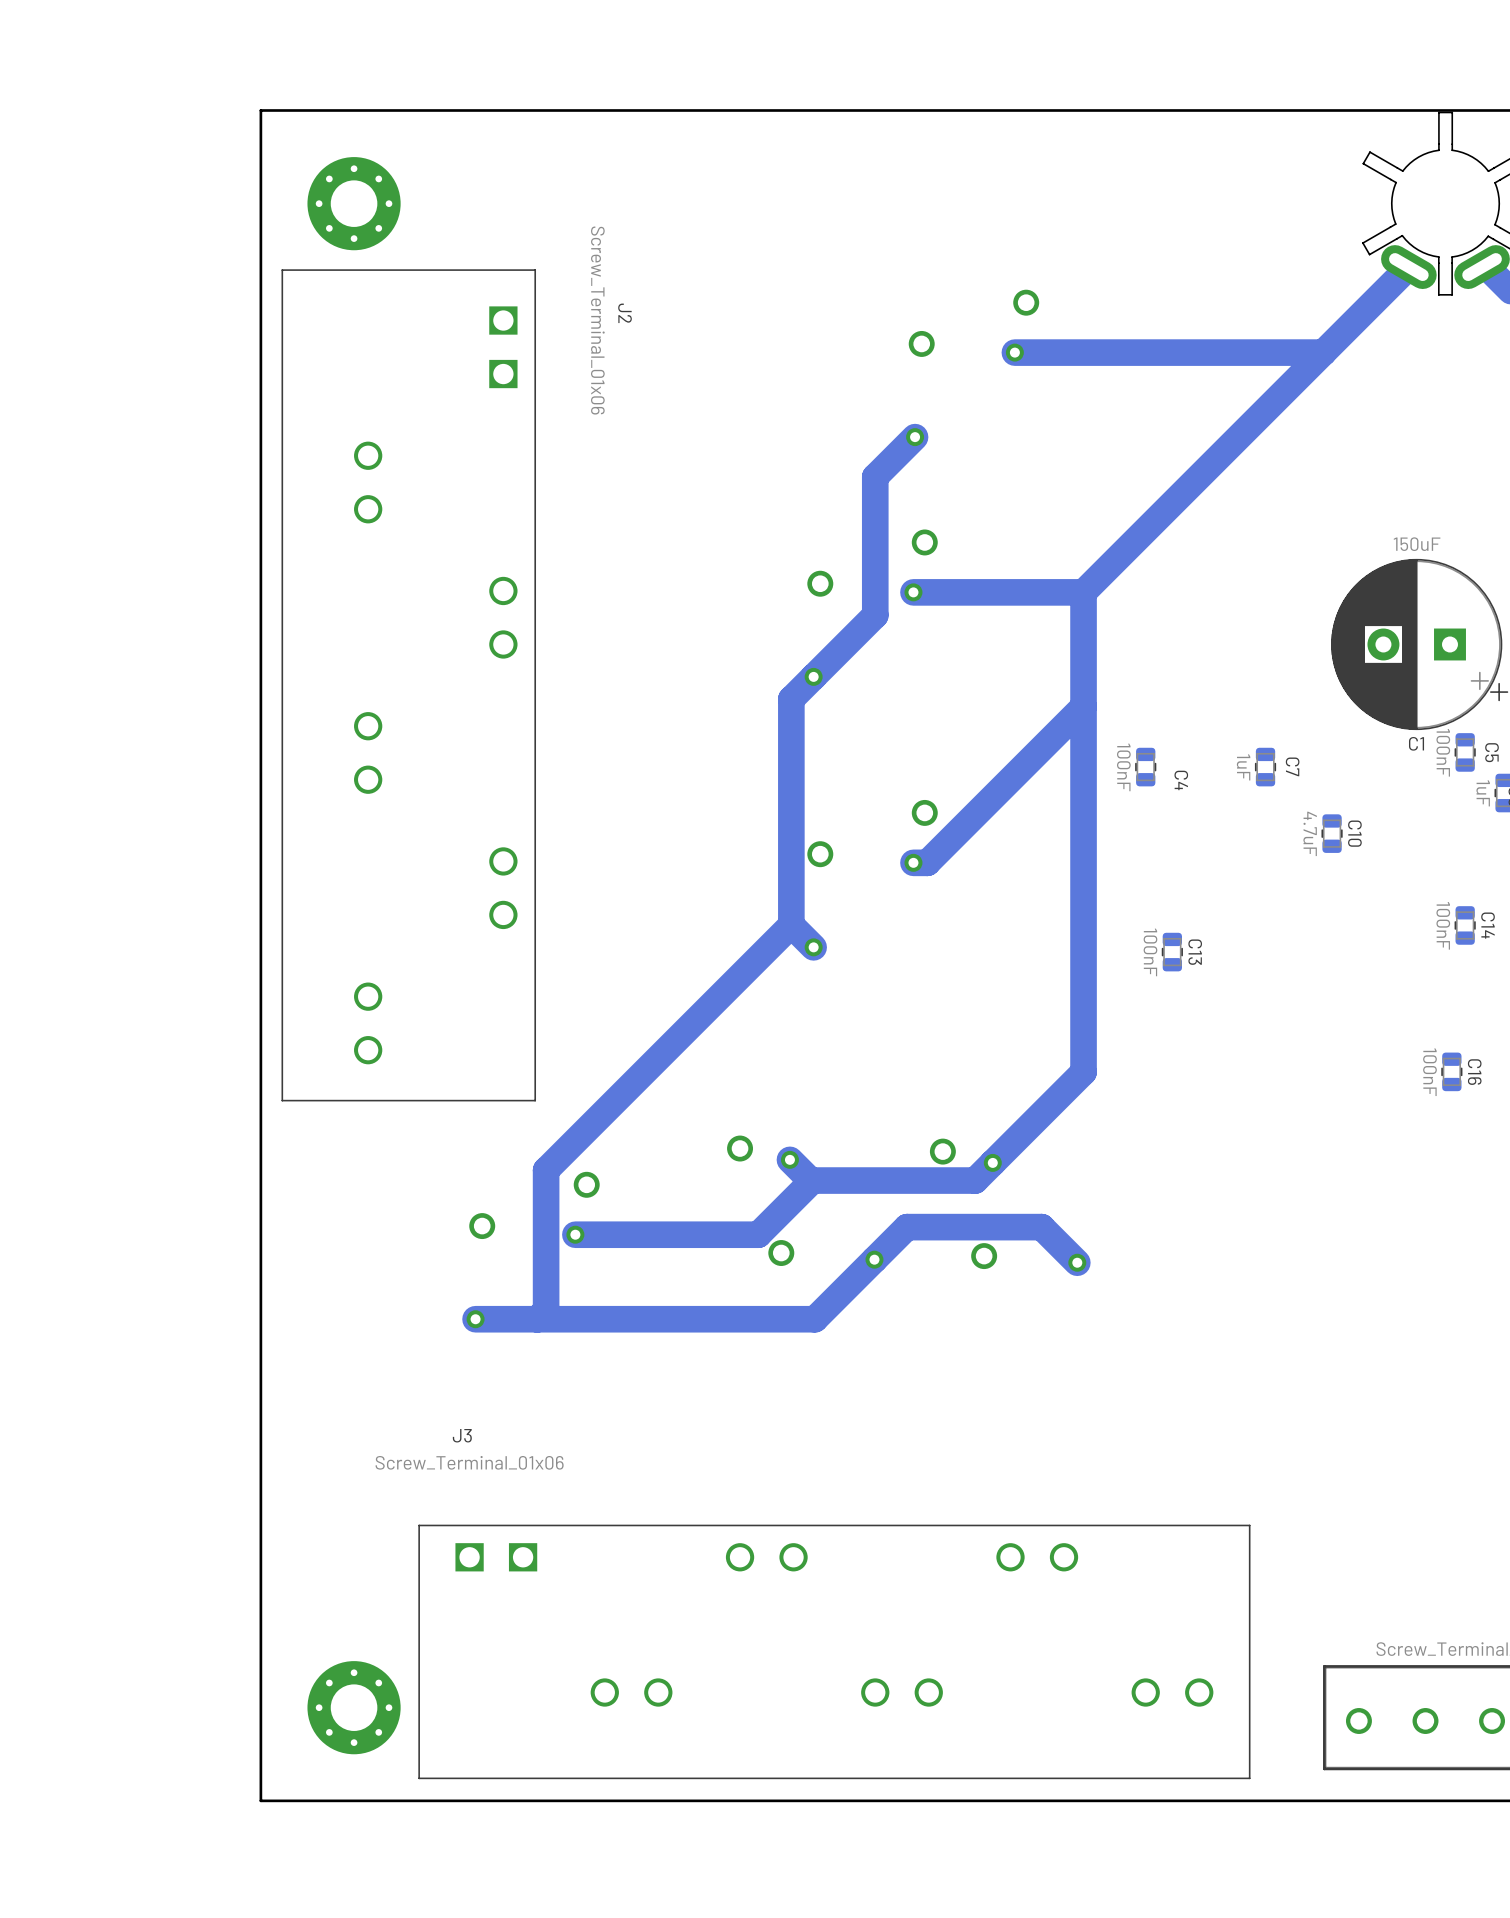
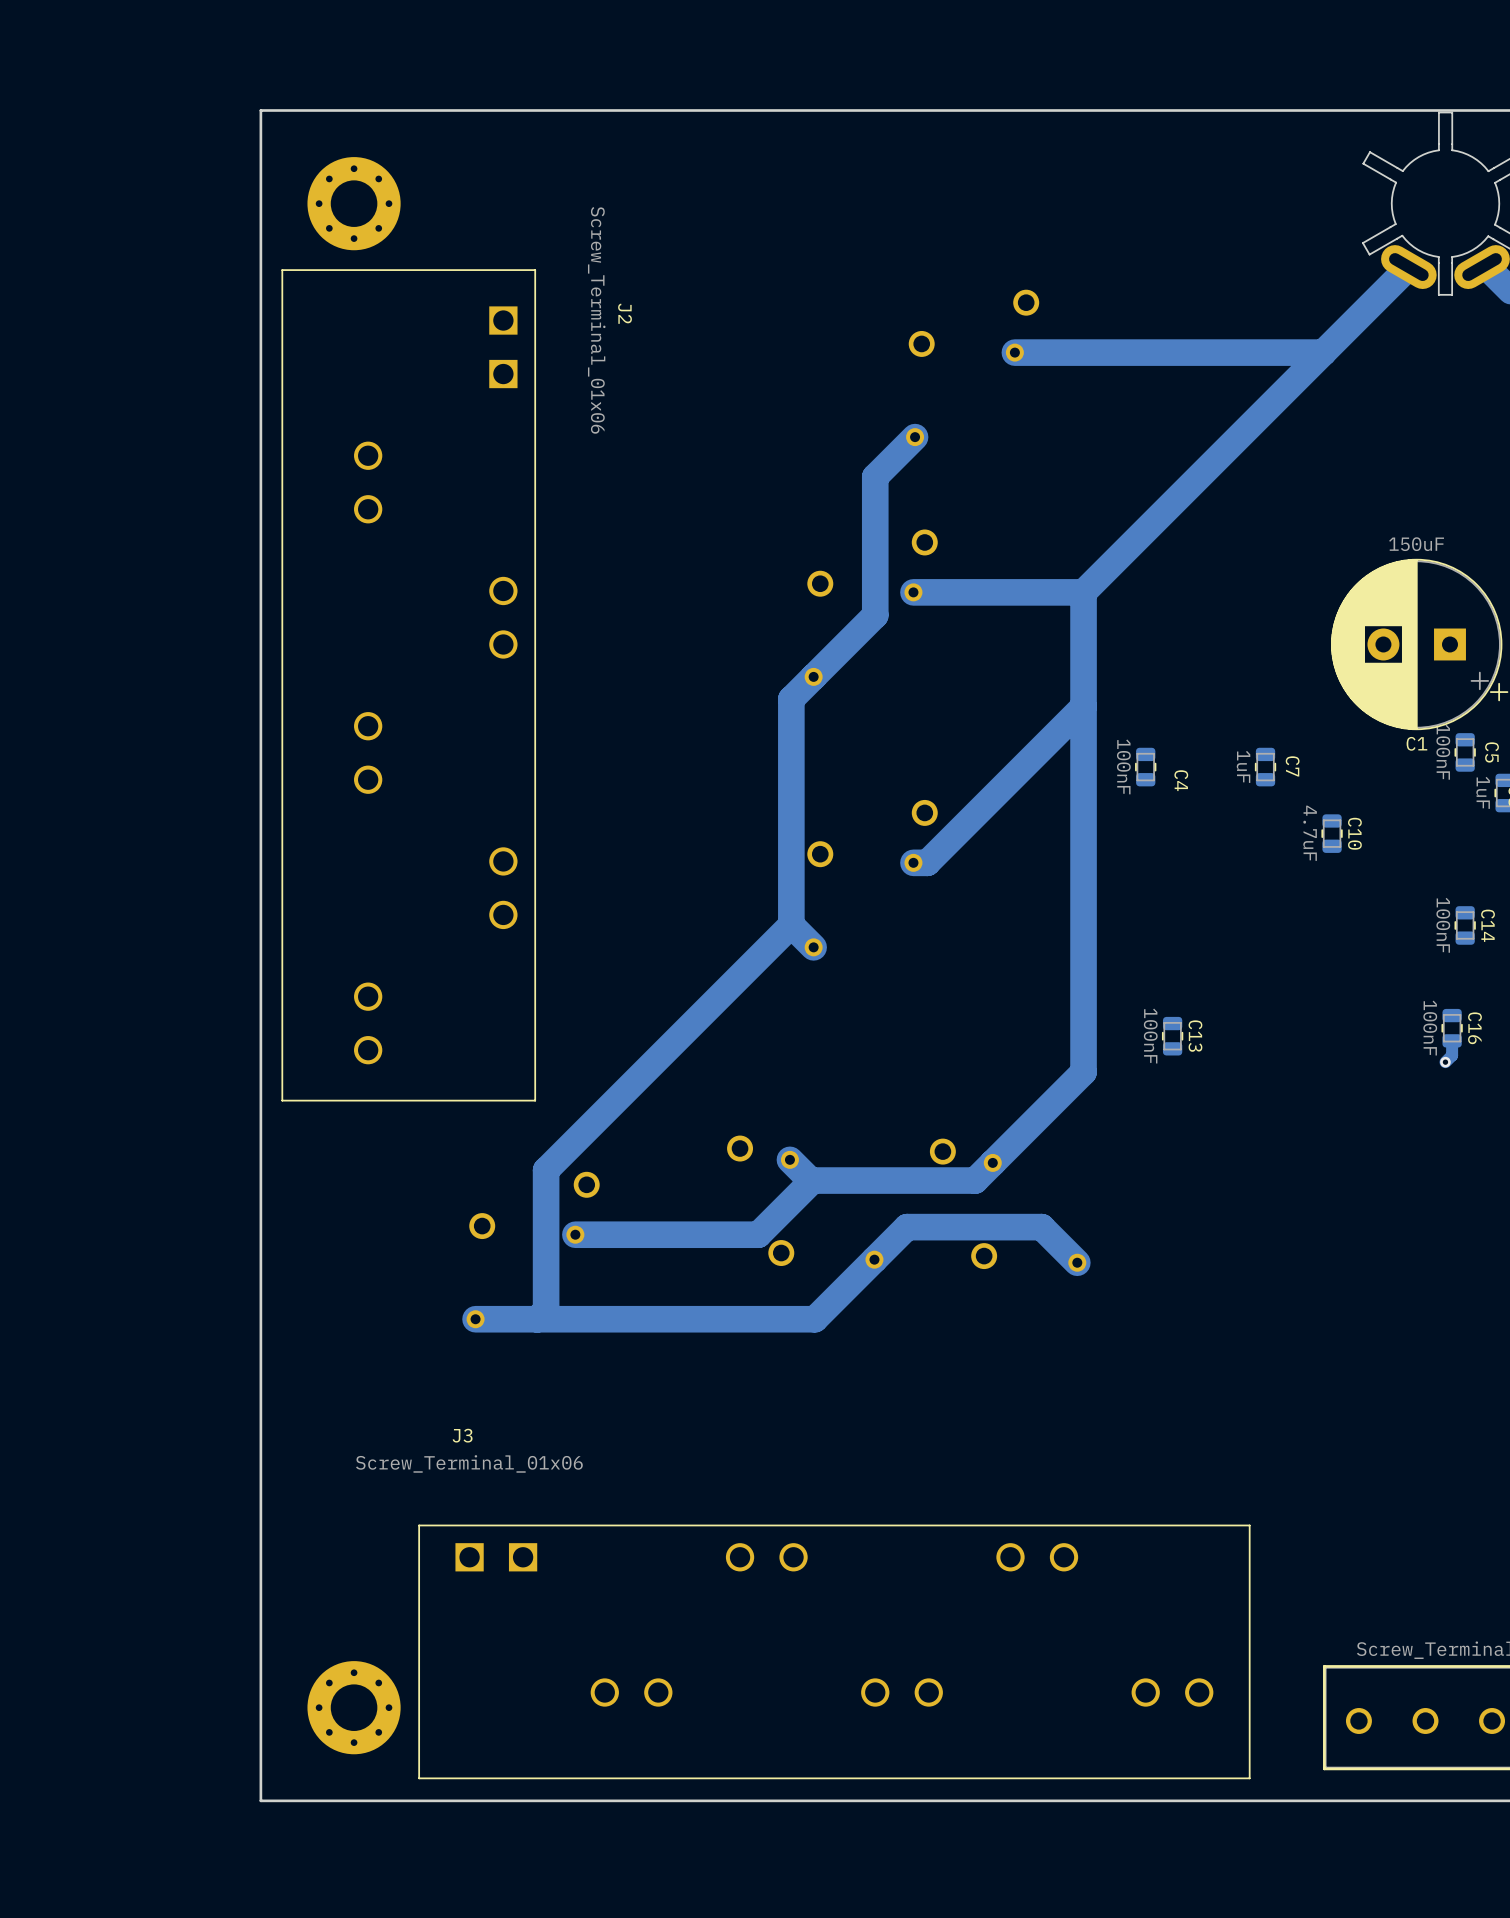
C13 position: (1172, 952) -> (1172, 1036)
track: none -> (1452, 1040) (1452, 1055) (1445, 1062)
via: none -> (1445, 1062)
C16 position: (1451, 1071) -> (1452, 1028)

